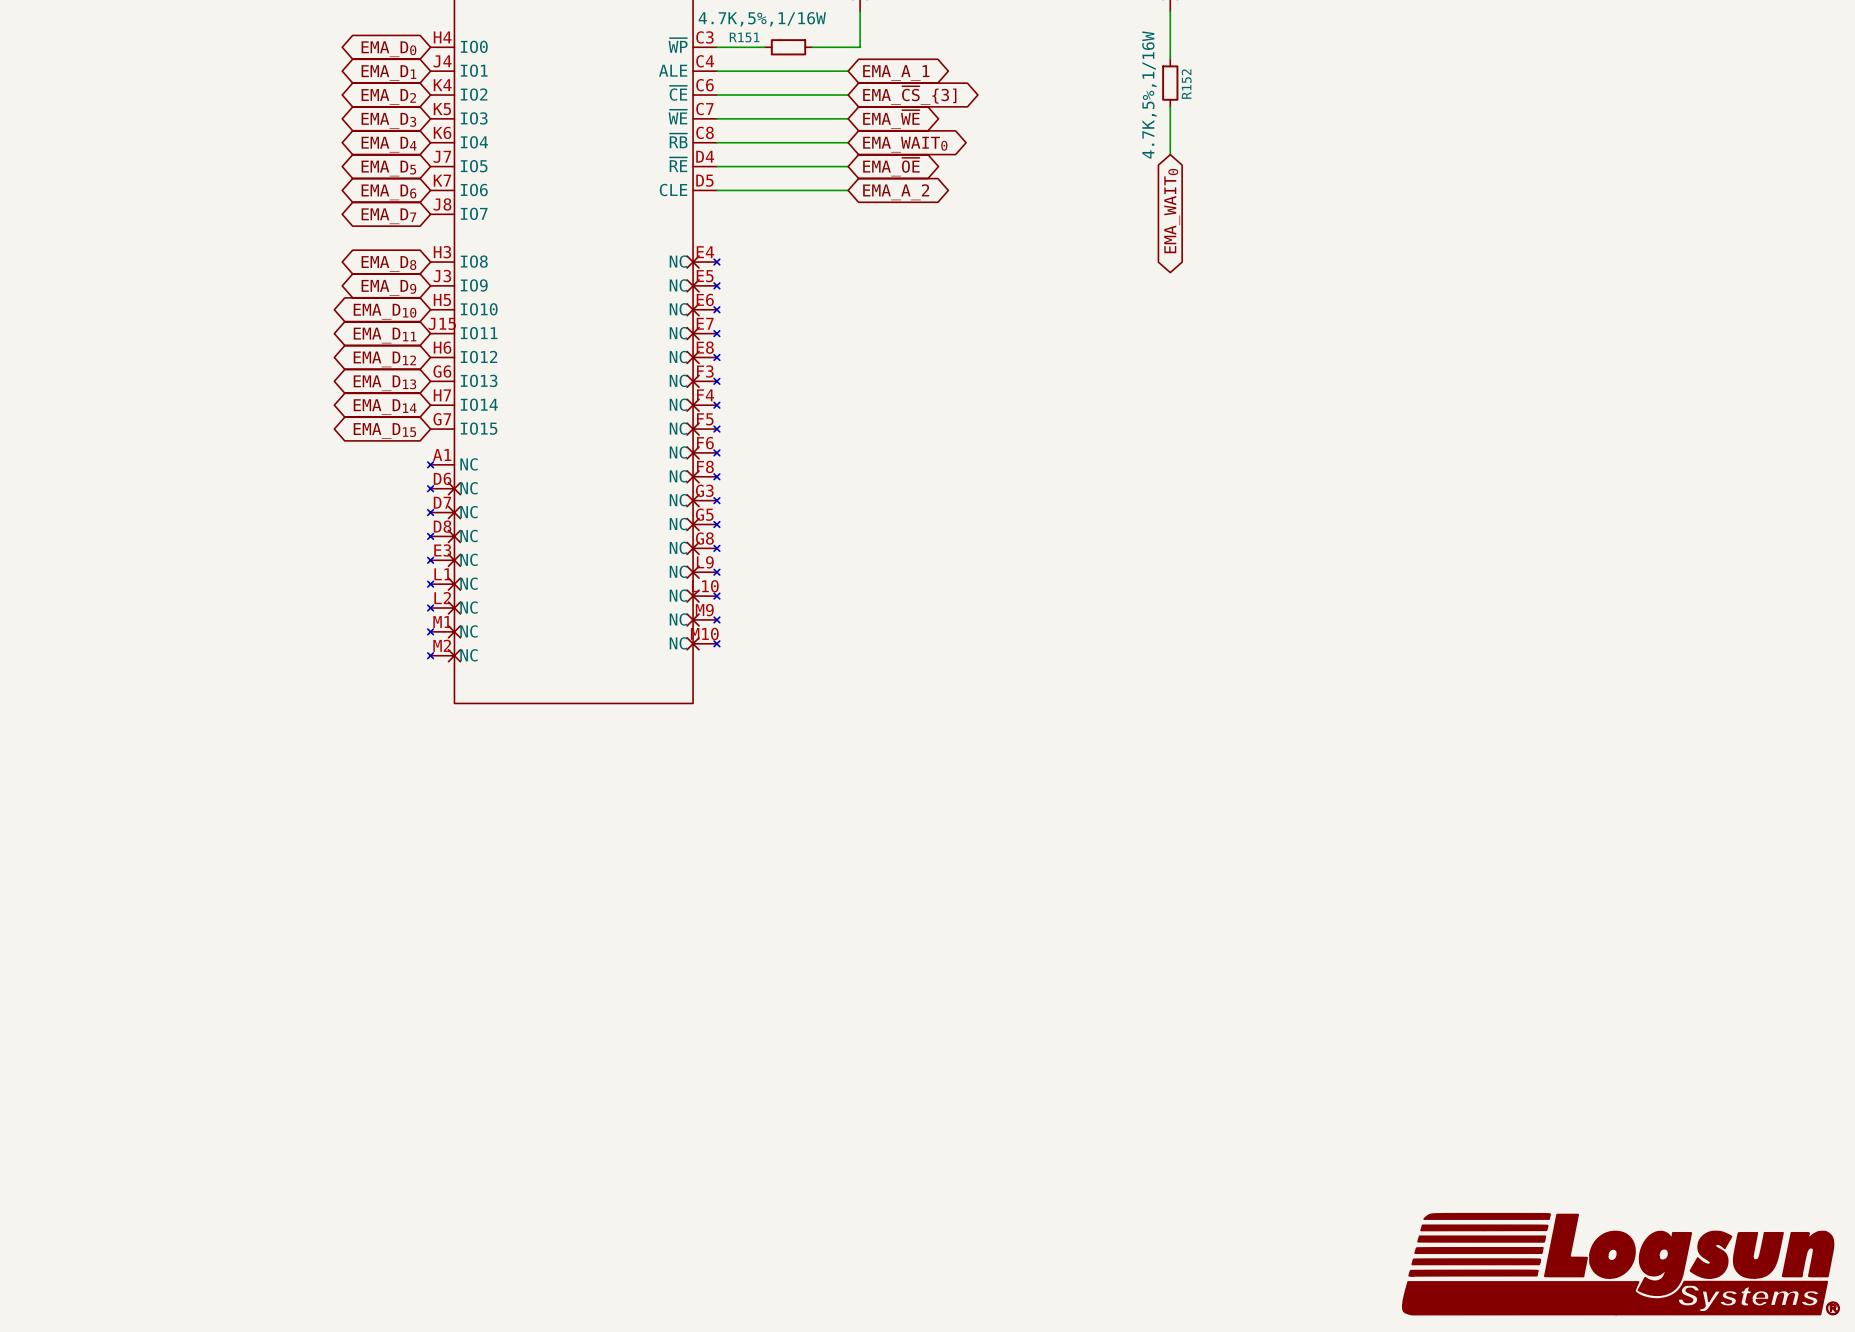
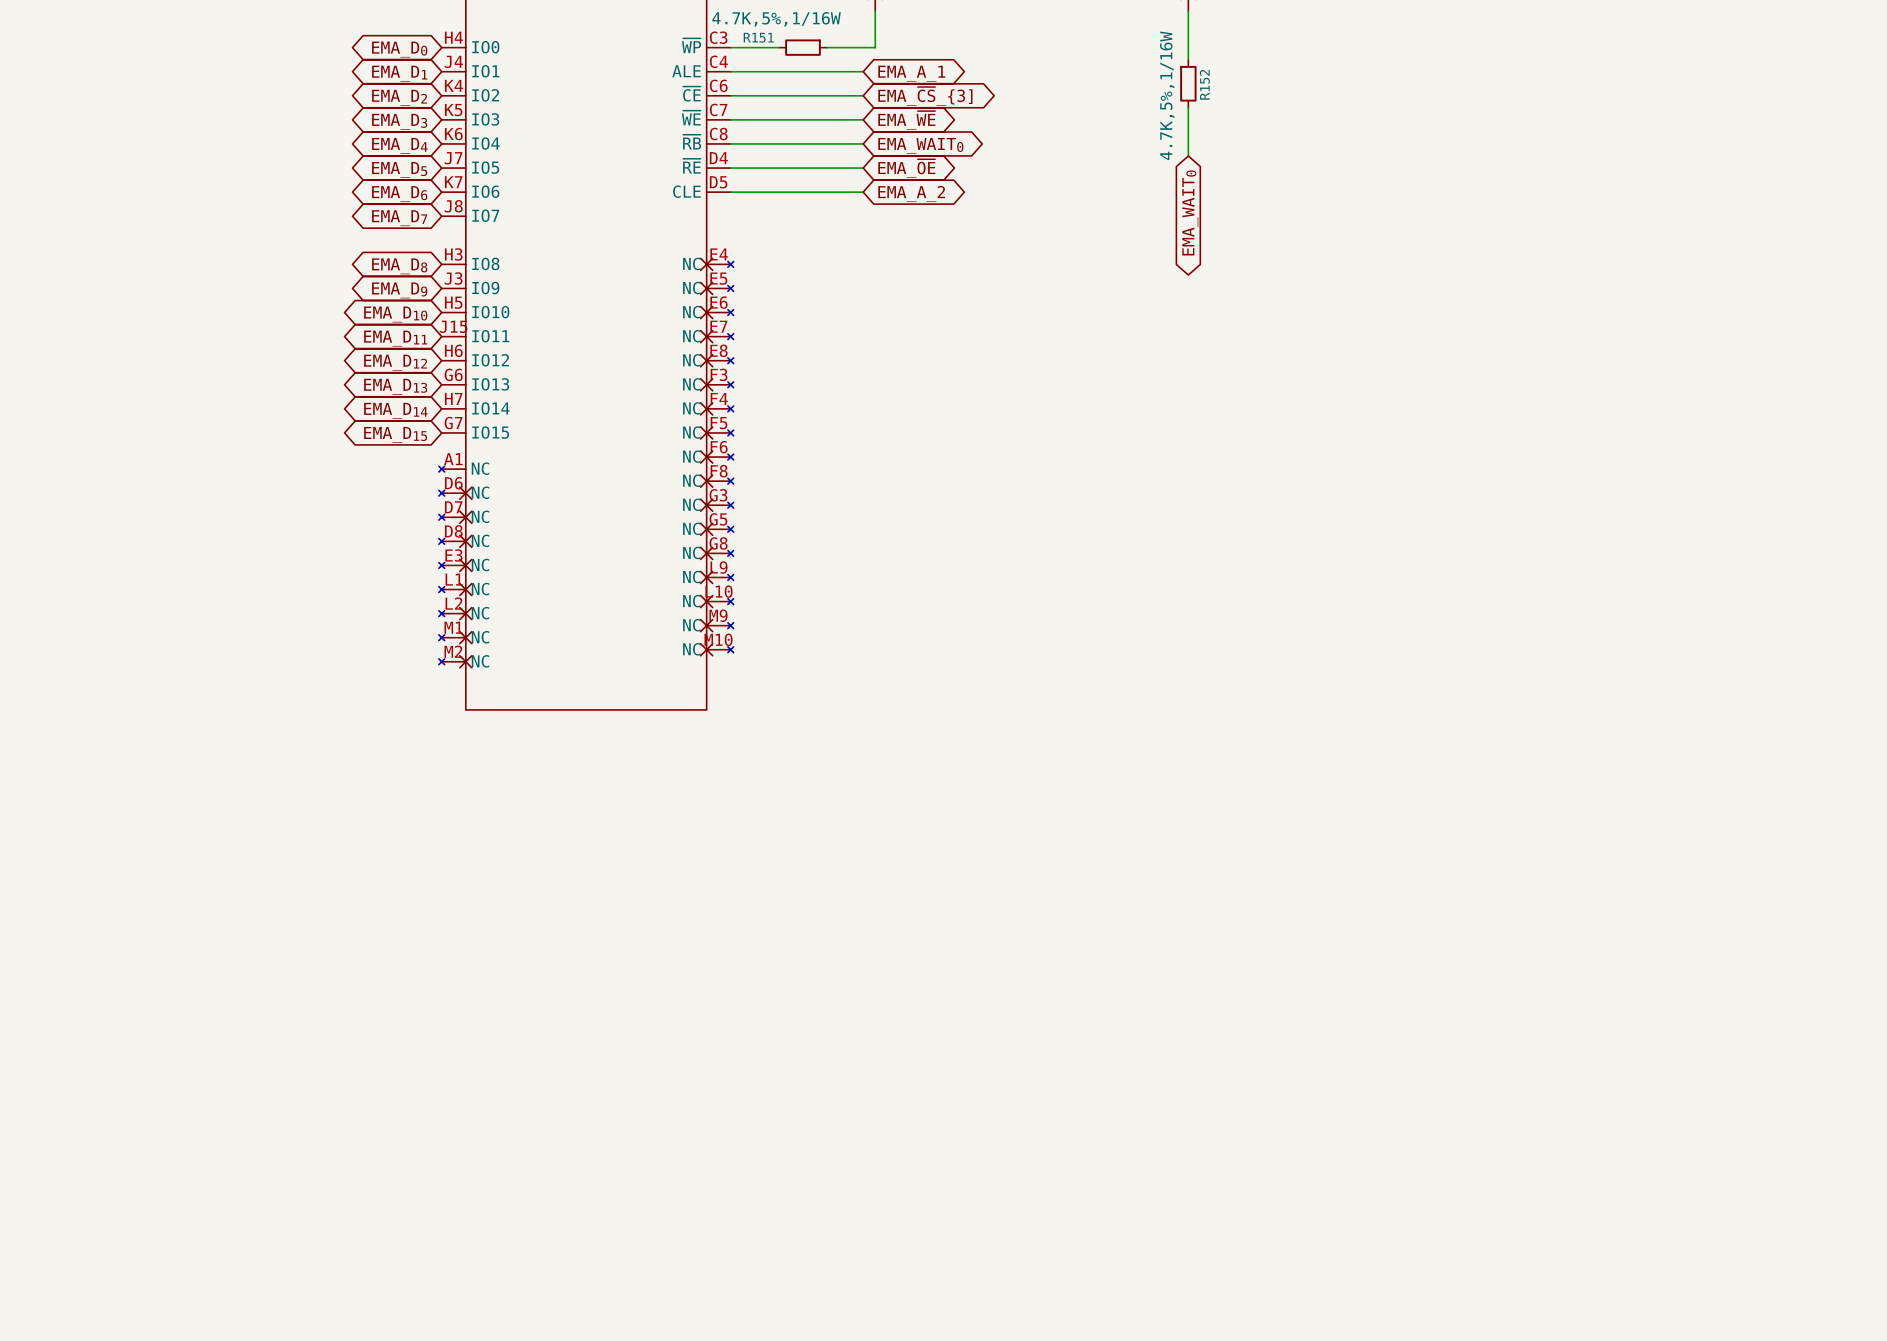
power symbol: (1620, 1264) -> none

